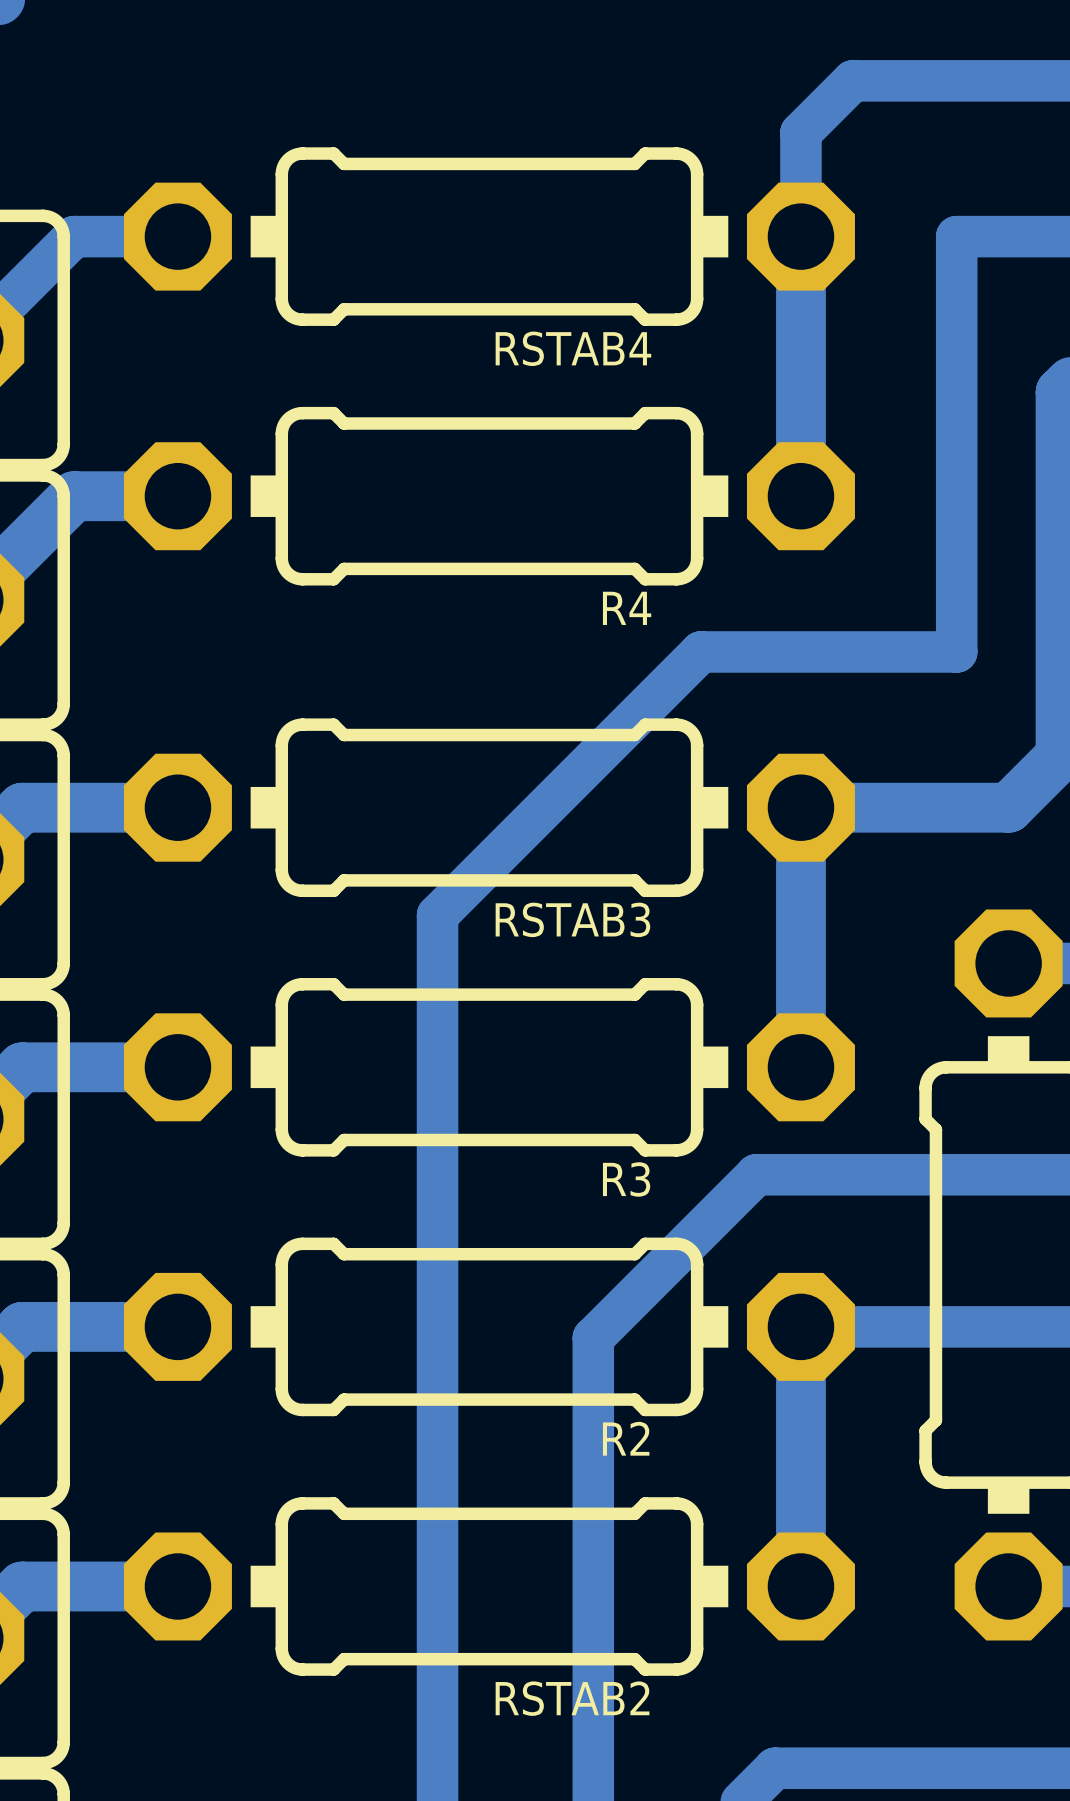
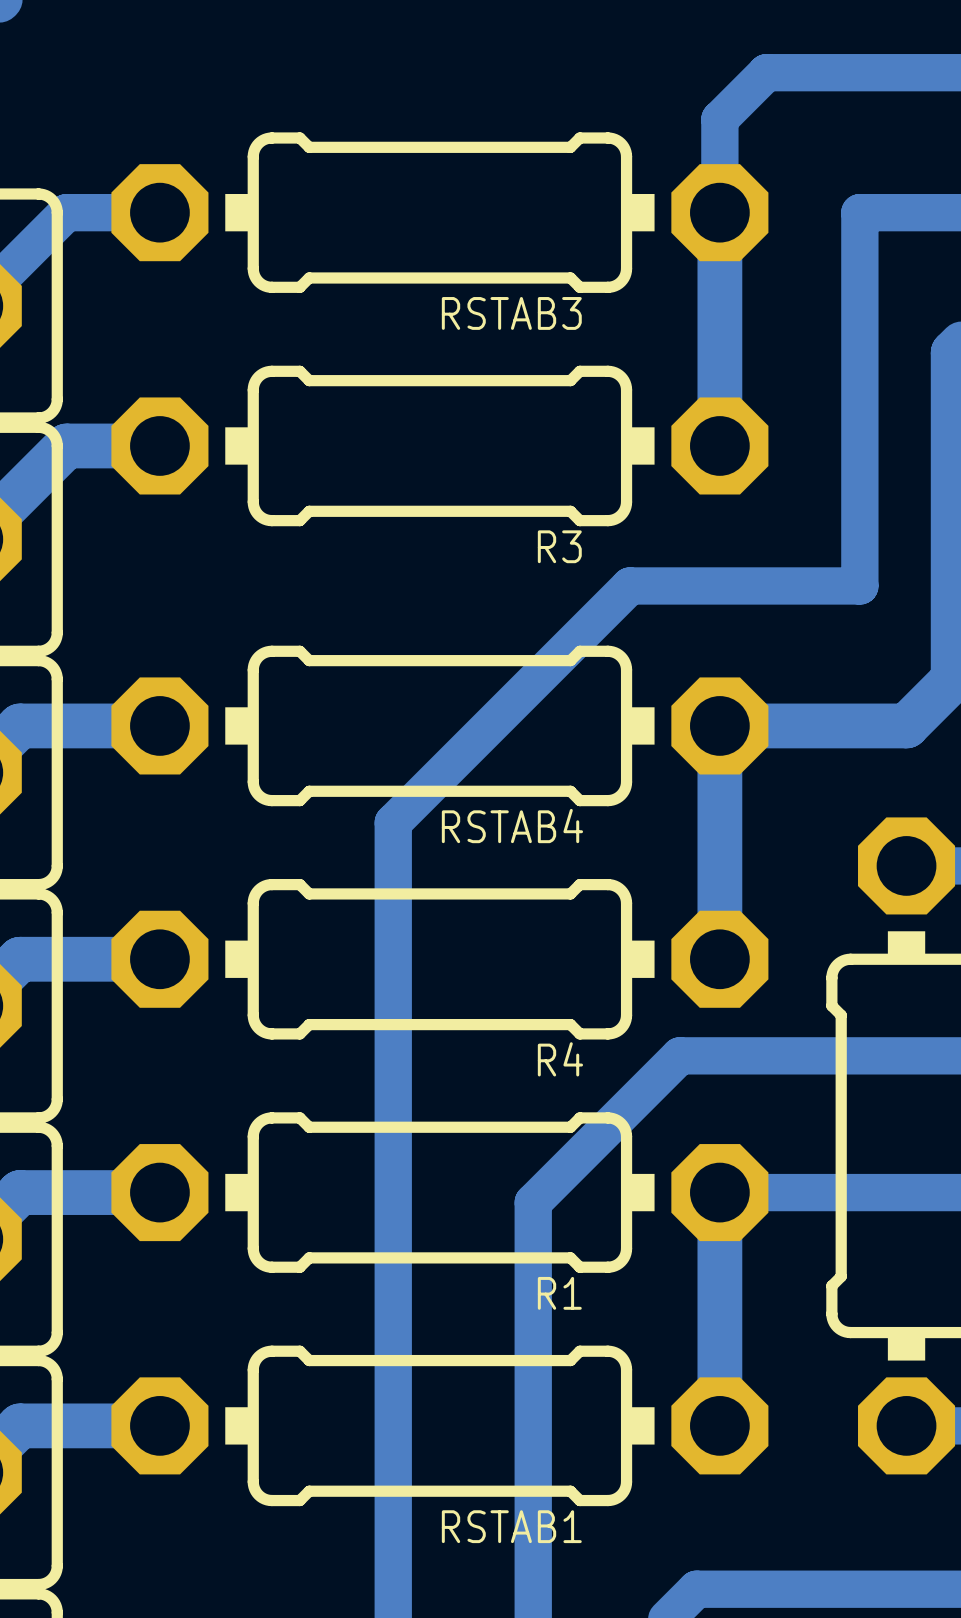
RSTAB4 name: RSTAB4 (573, 348) -> RSTAB3 (511, 313)
R4 name: R4 (627, 608) -> R3 (559, 546)
RSTAB3 name: RSTAB3 (572, 919) -> RSTAB4 (512, 826)
R3 name: R3 (626, 1179) -> R4 (560, 1059)
R2 name: R2 (626, 1438) -> R1 (559, 1293)
RSTAB2 name: RSTAB2 (572, 1698) -> RSTAB1 (511, 1526)

